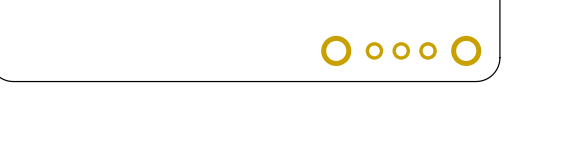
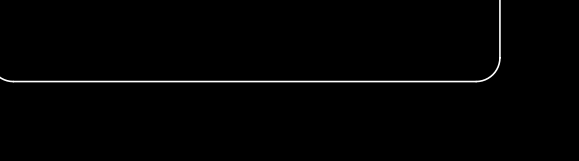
part: (401, 50) -> none

